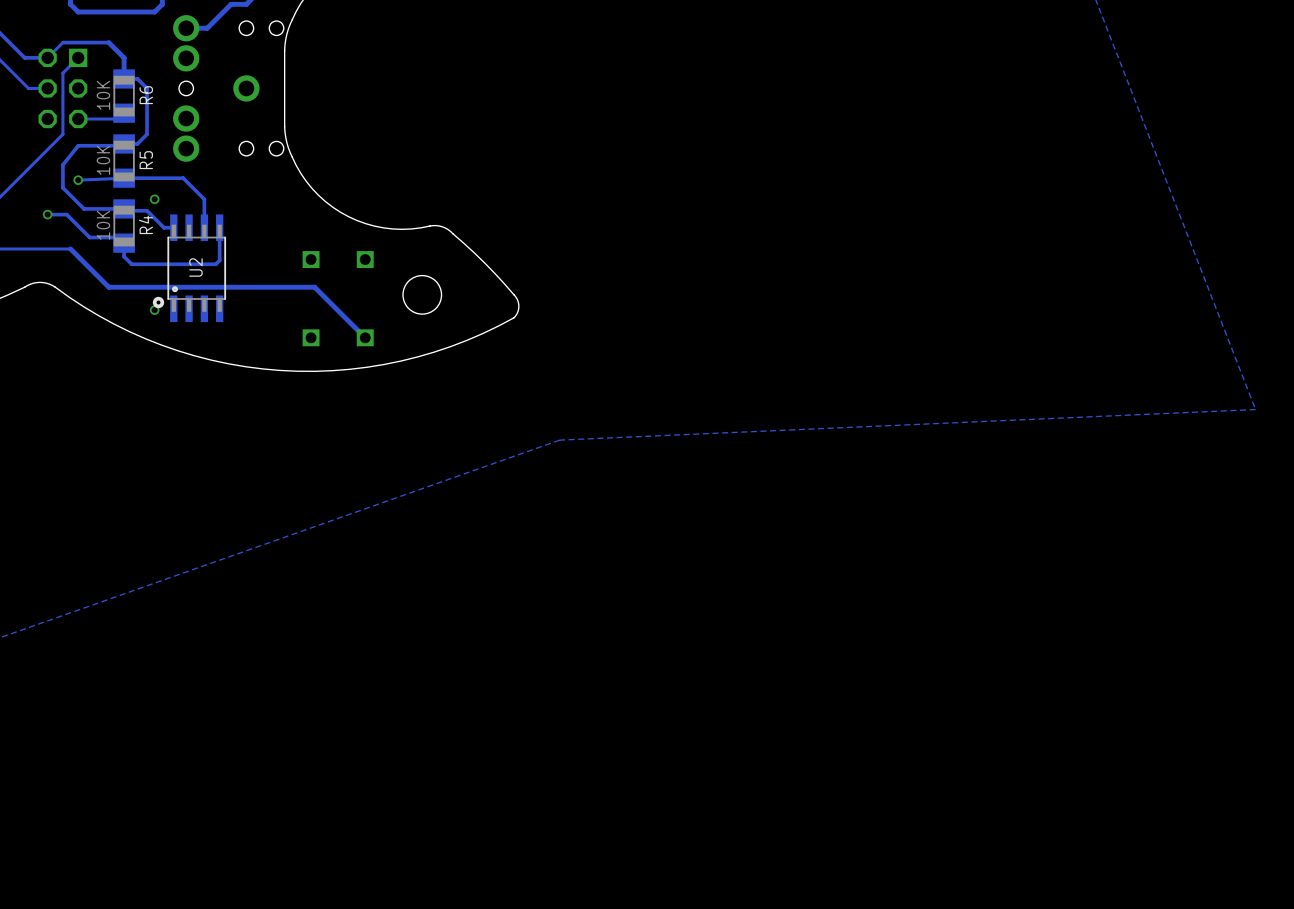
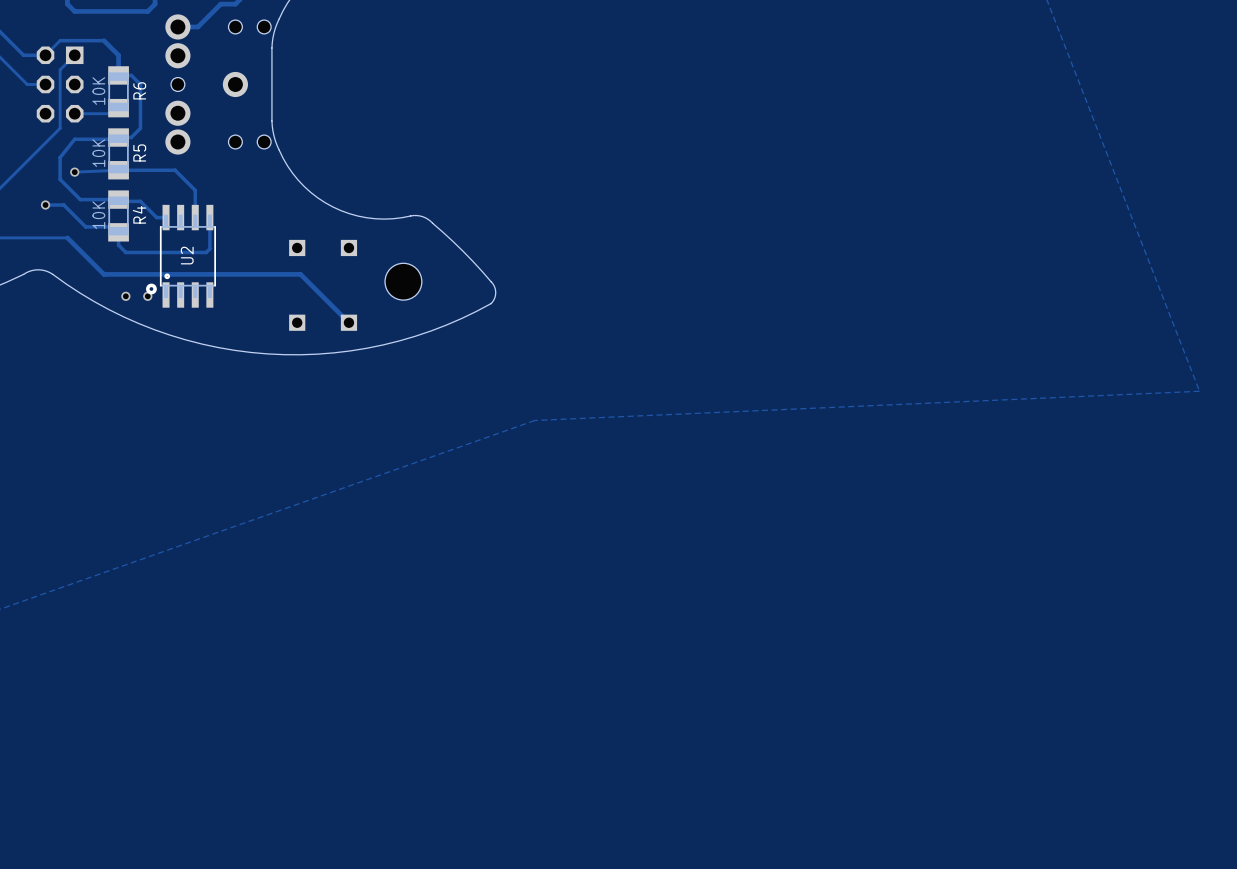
via: (154, 199) -> none
via: none -> (125, 296)

